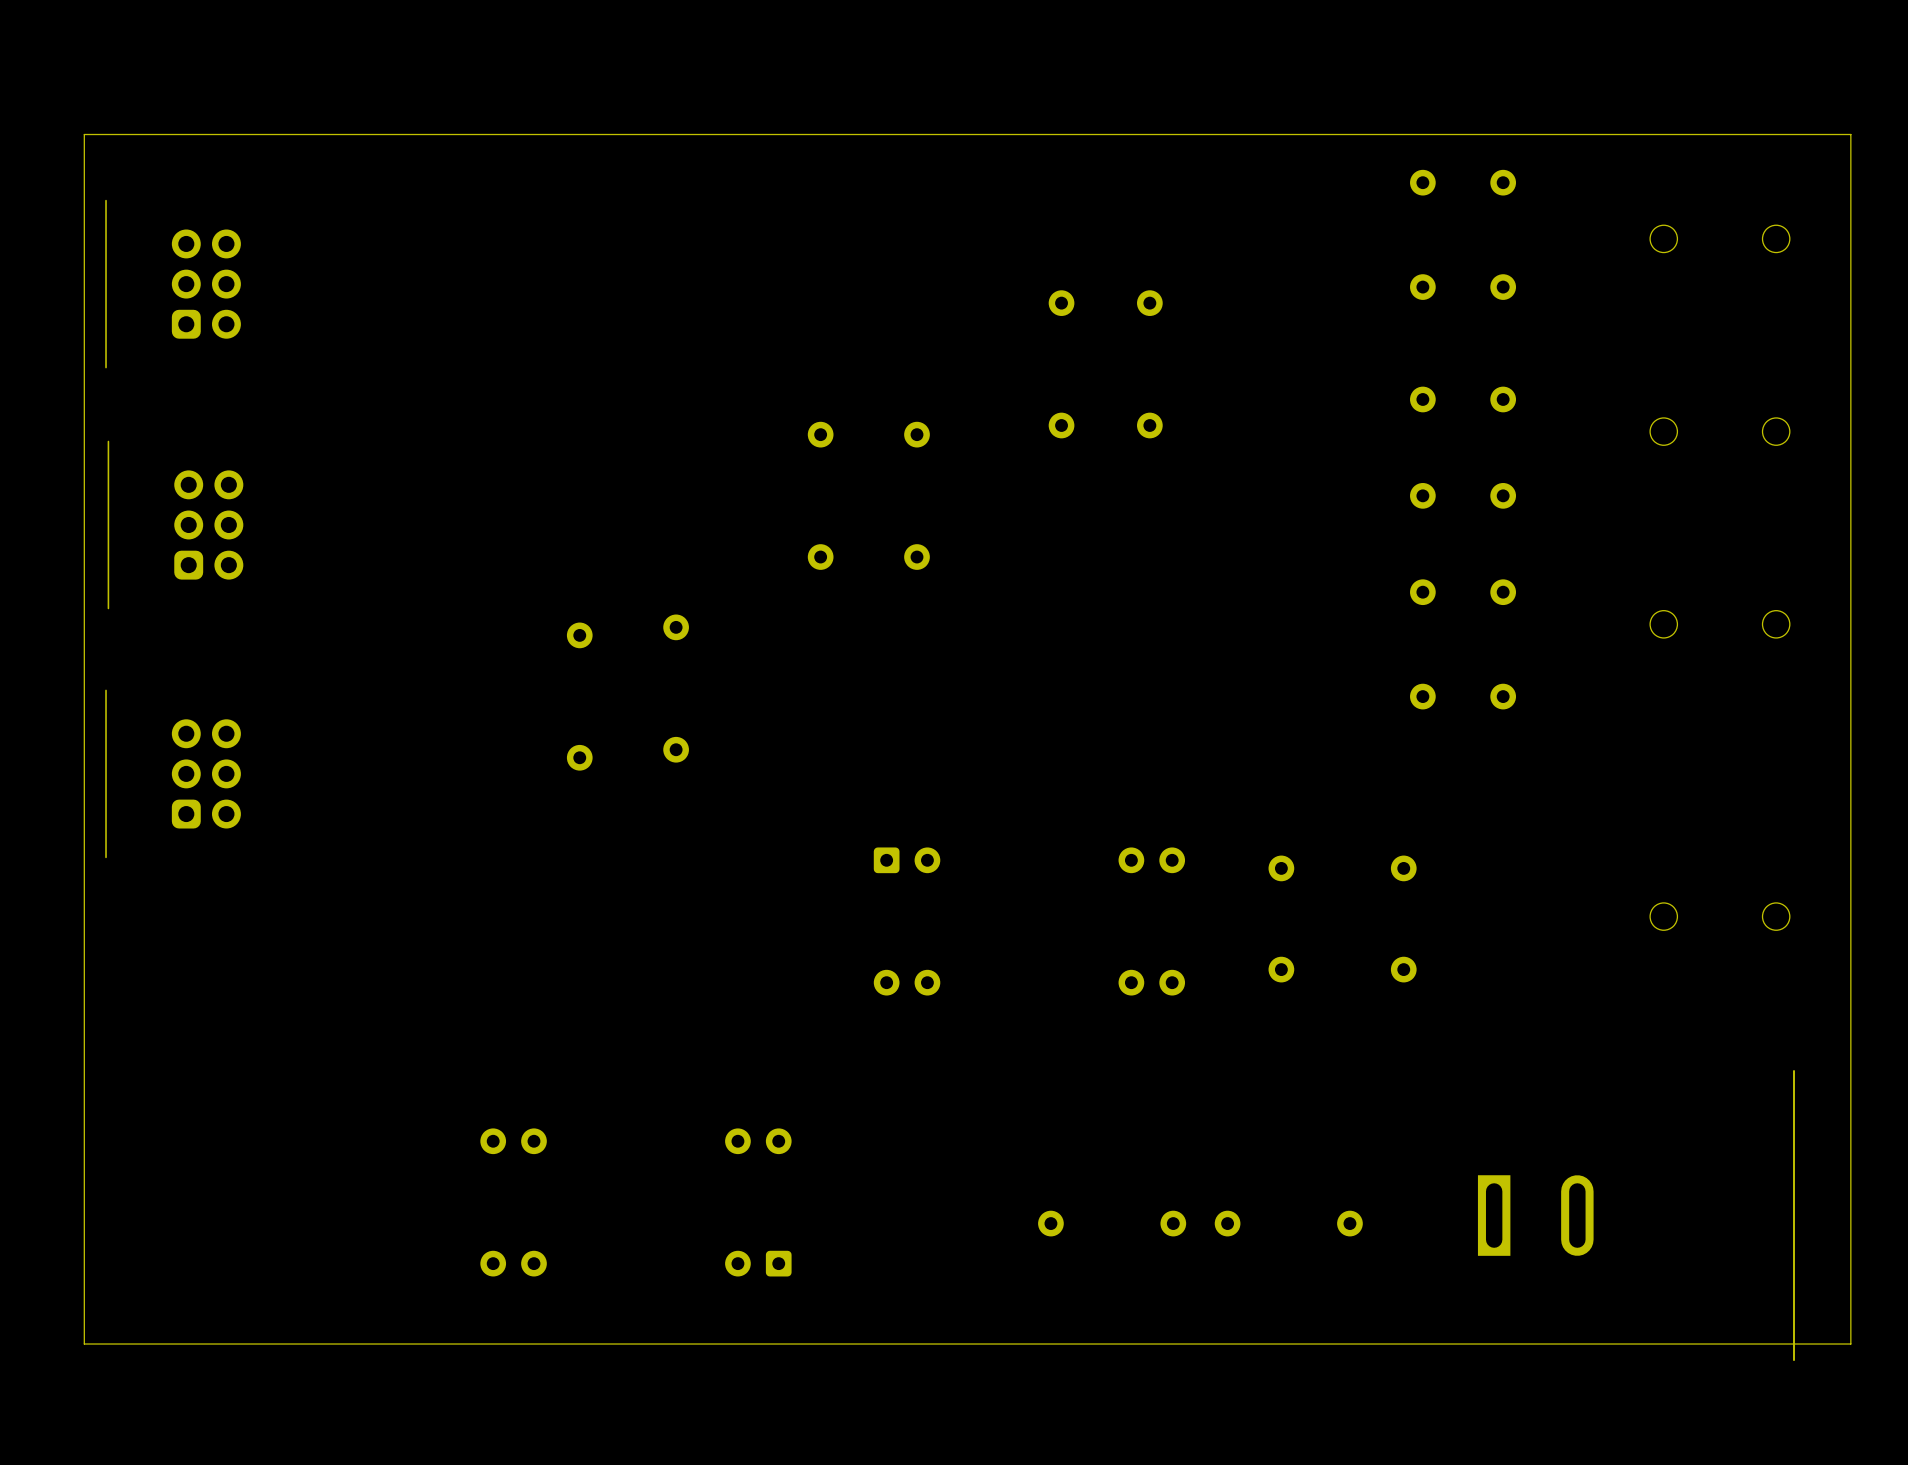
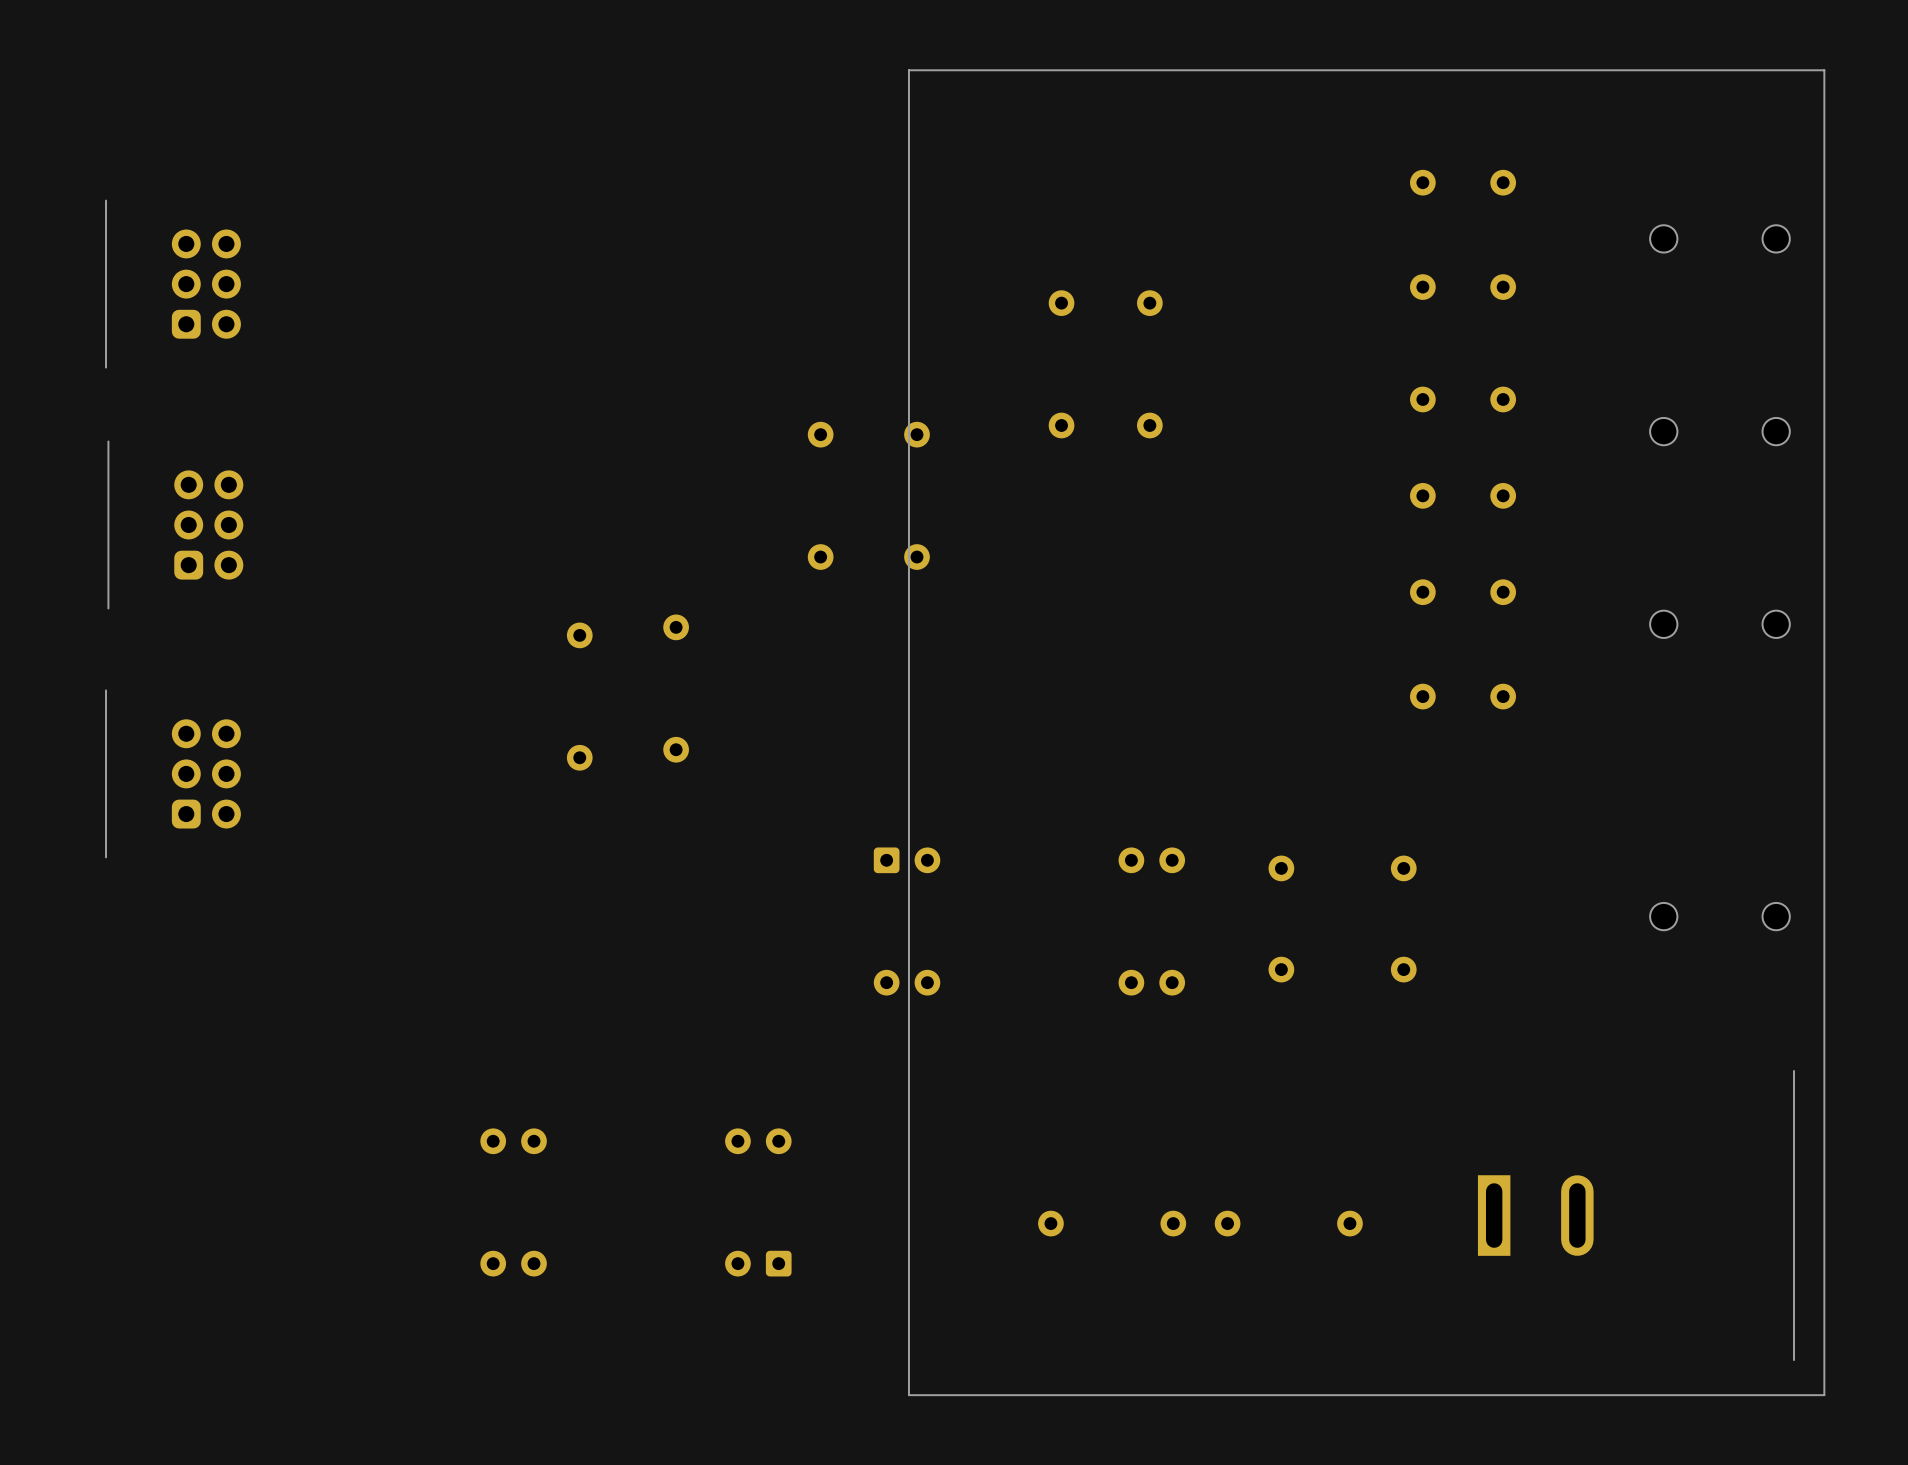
board edge: none -> (1824, 70) (908, 70) (908, 1395) (1824, 1395) (1824, 70)
board edge: (1850, 134) (84, 134) (84, 1344) (1850, 1344) (1850, 134) -> none

